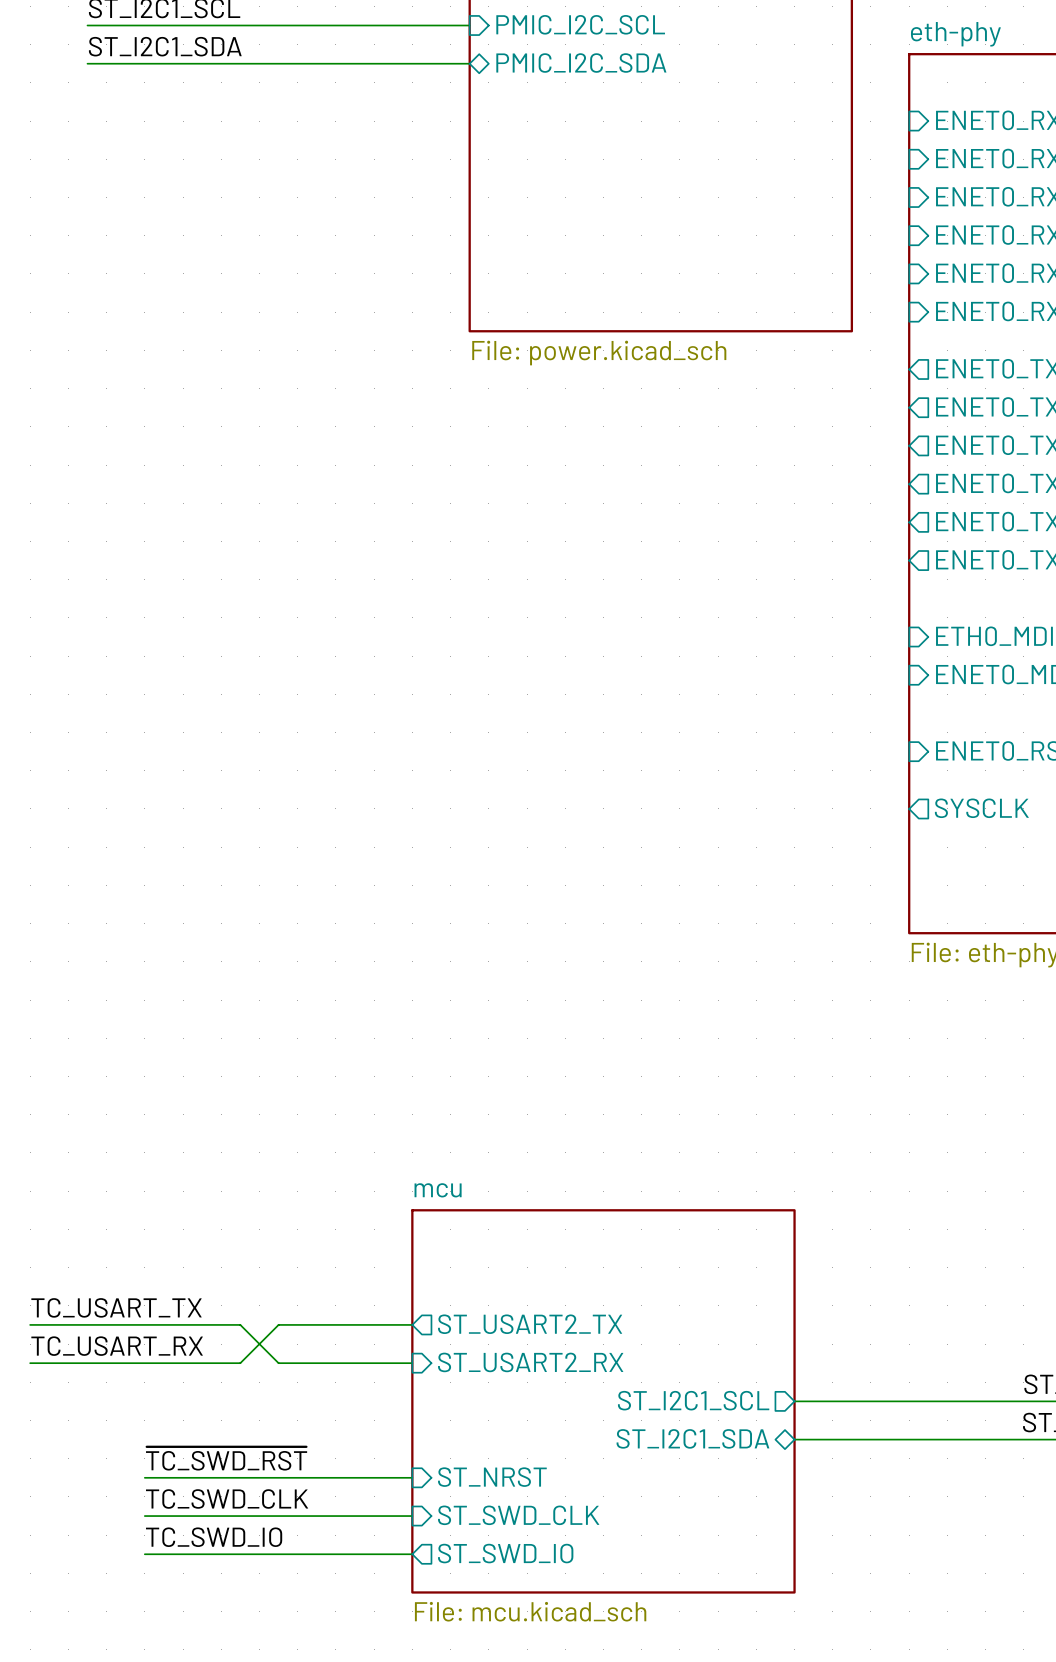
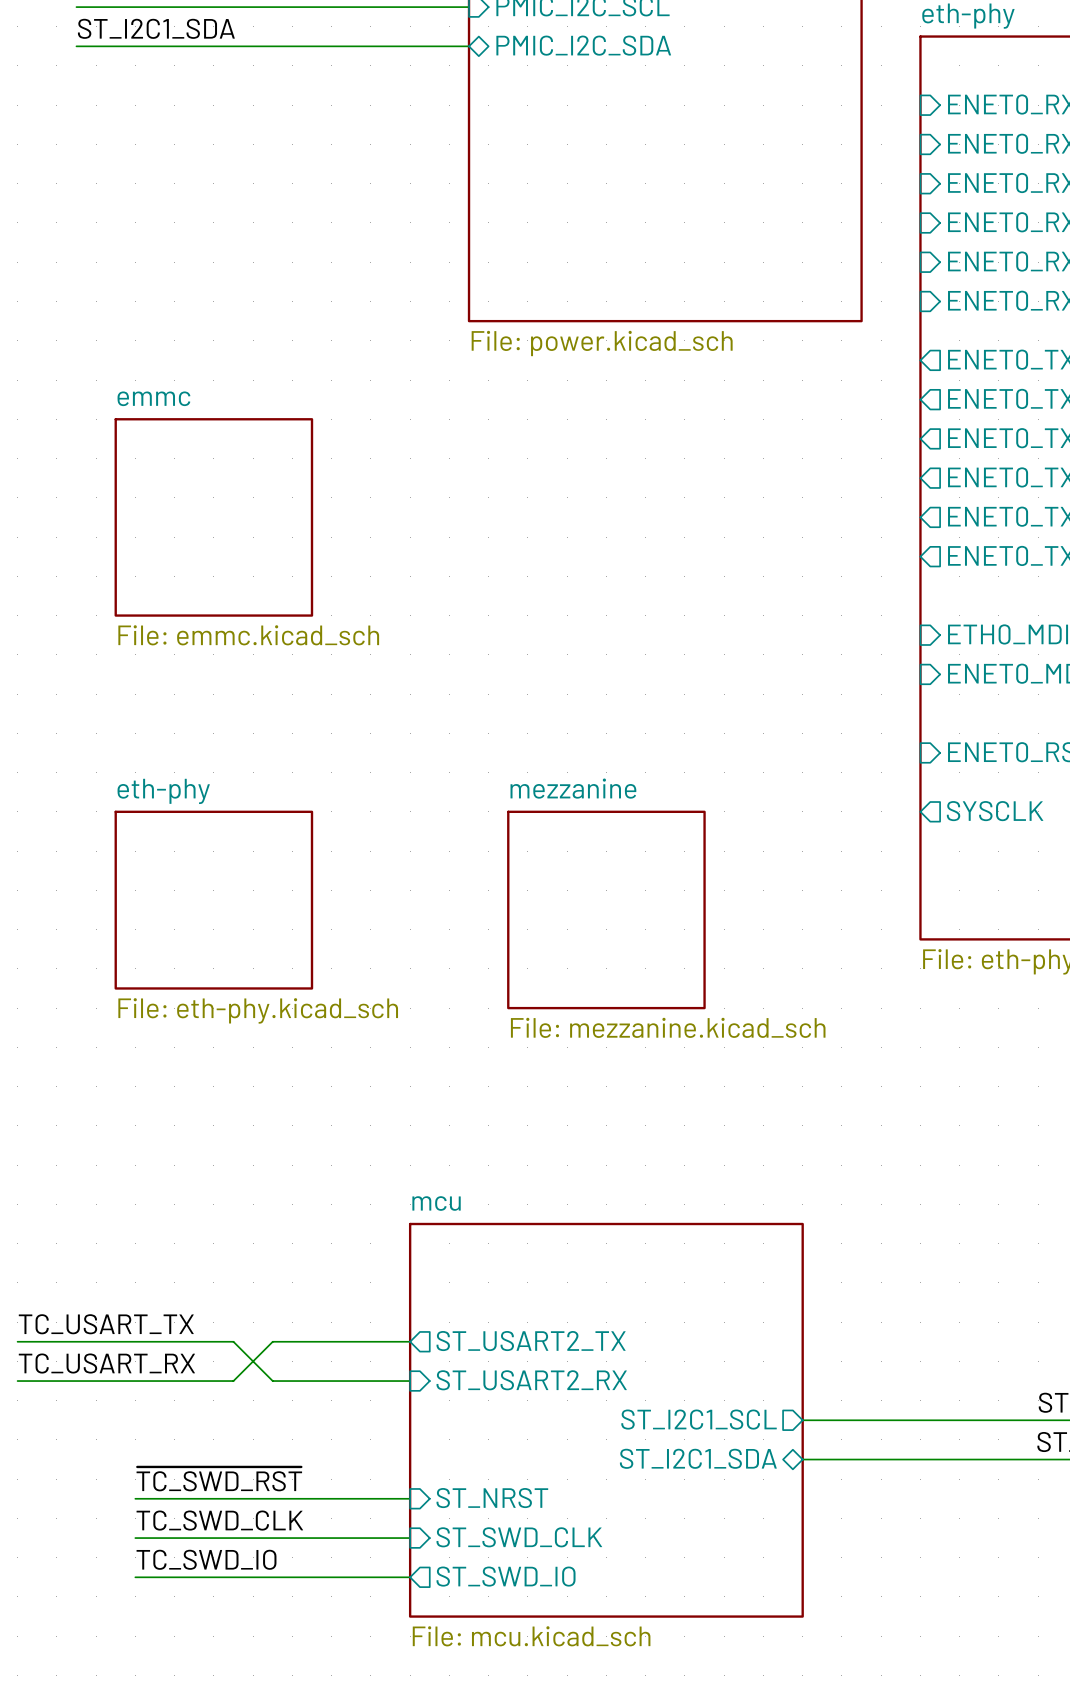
sheet emmc: none -> File: emmc.kicad_sch (213, 517)
sheet eth-phy: none -> File: eth-phy.kicad_sch (213, 900)
sheet mezzanine: none -> File: mezzanine.kicad_sch (606, 909)

